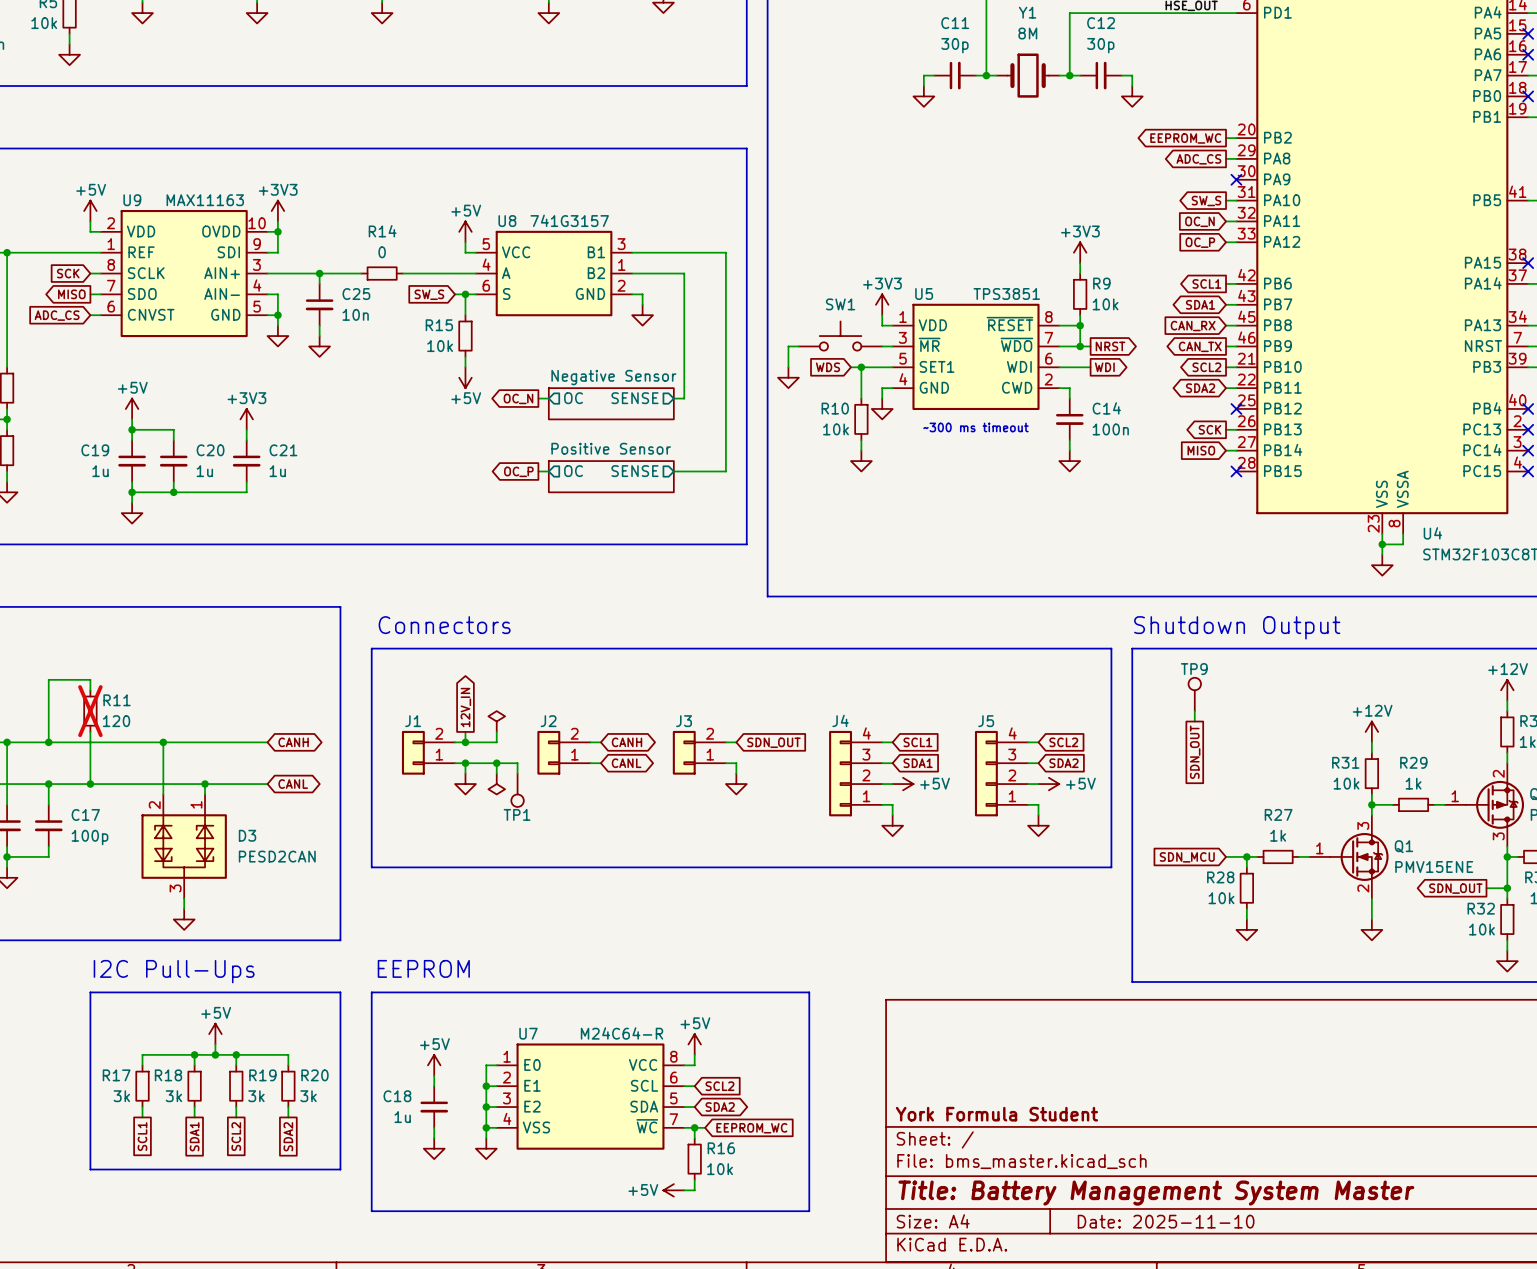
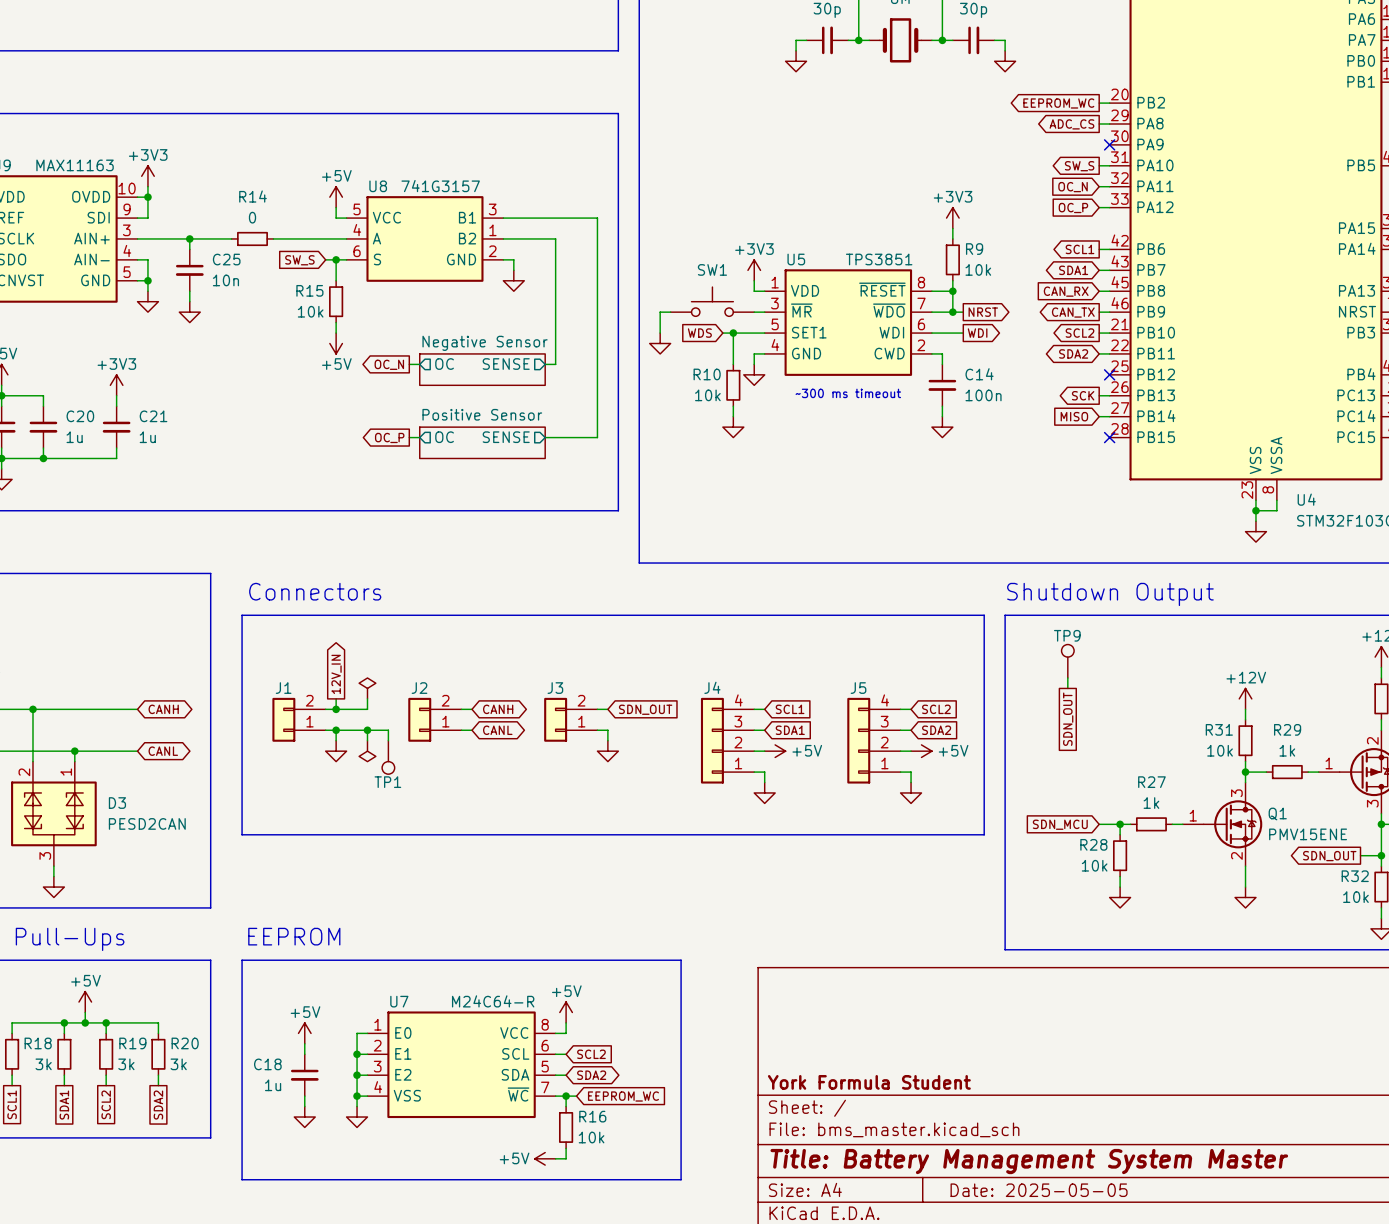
title block: Date: 2025-11-10 (1166, 1221) -> Date: 2025-05-05 (1039, 1190)

